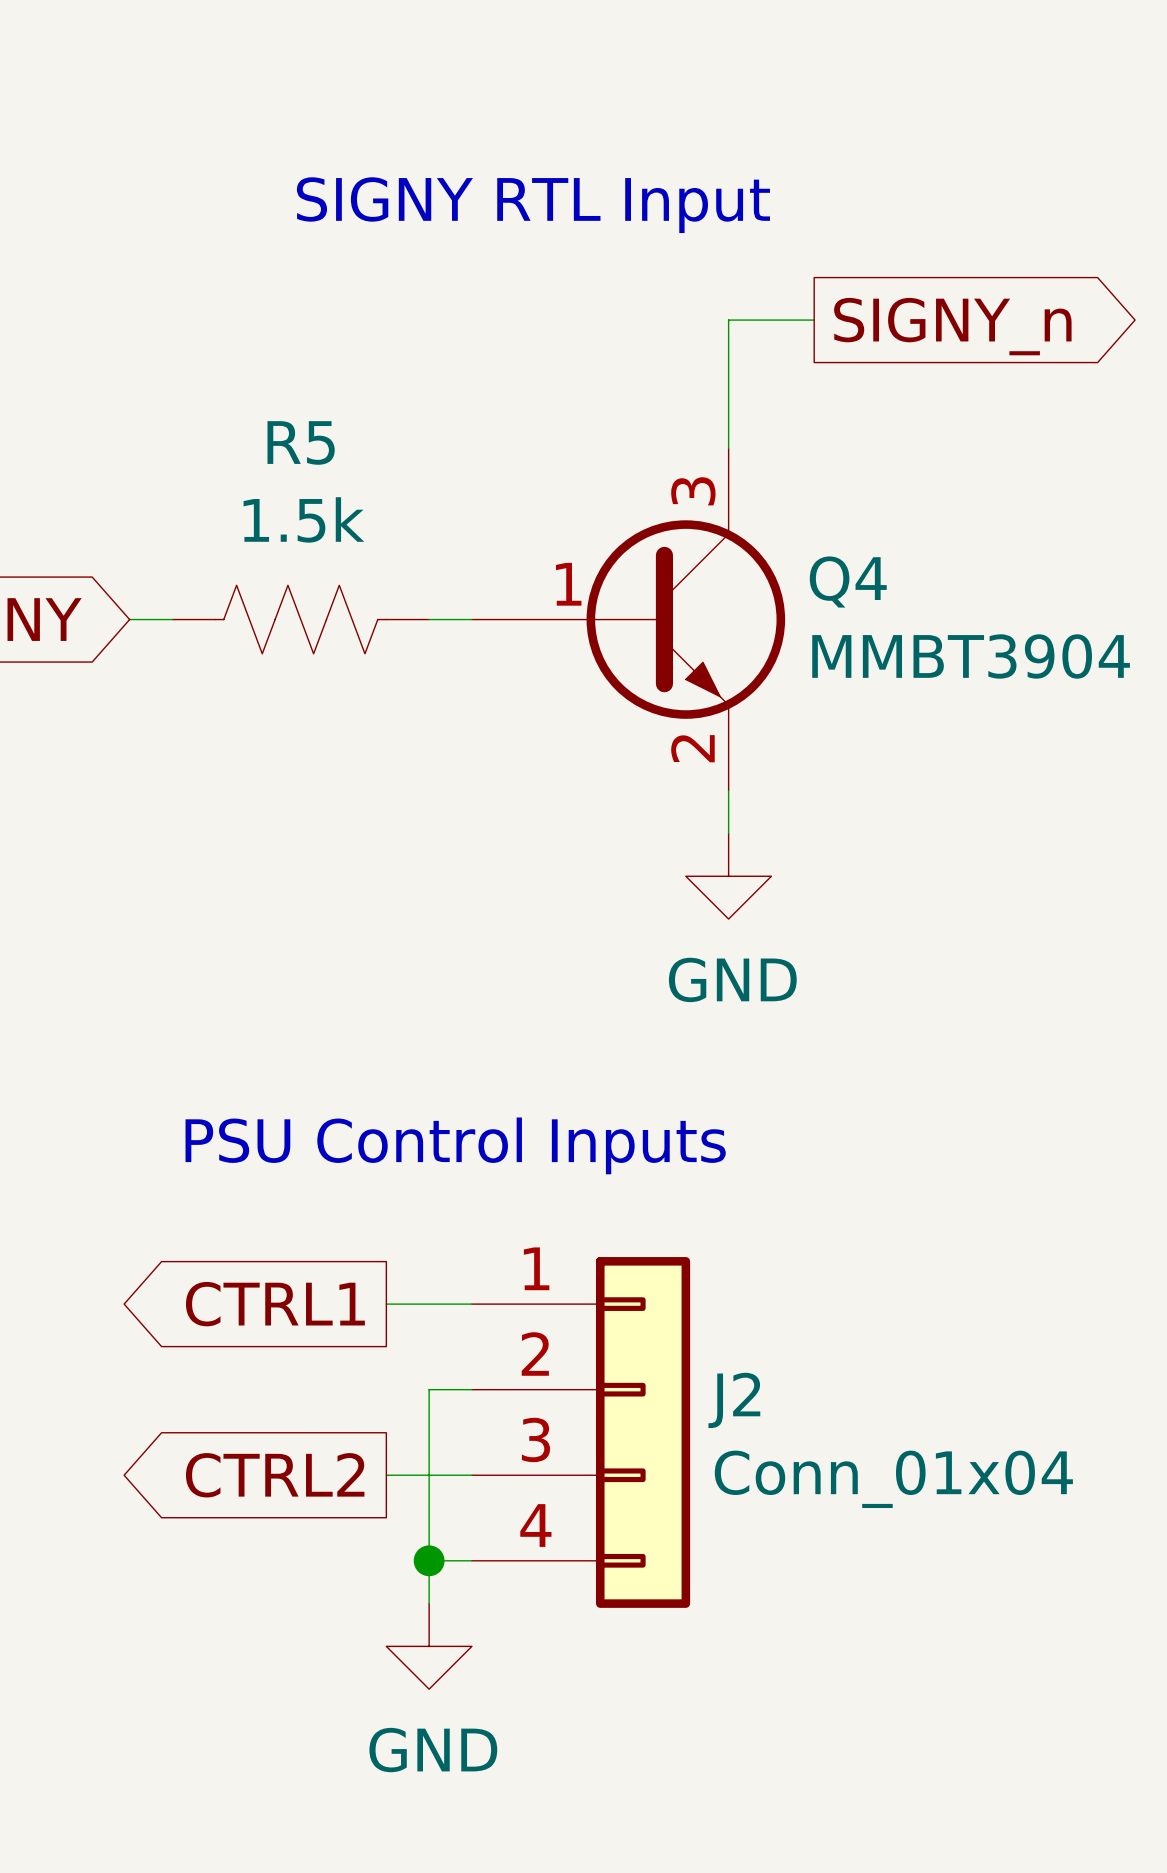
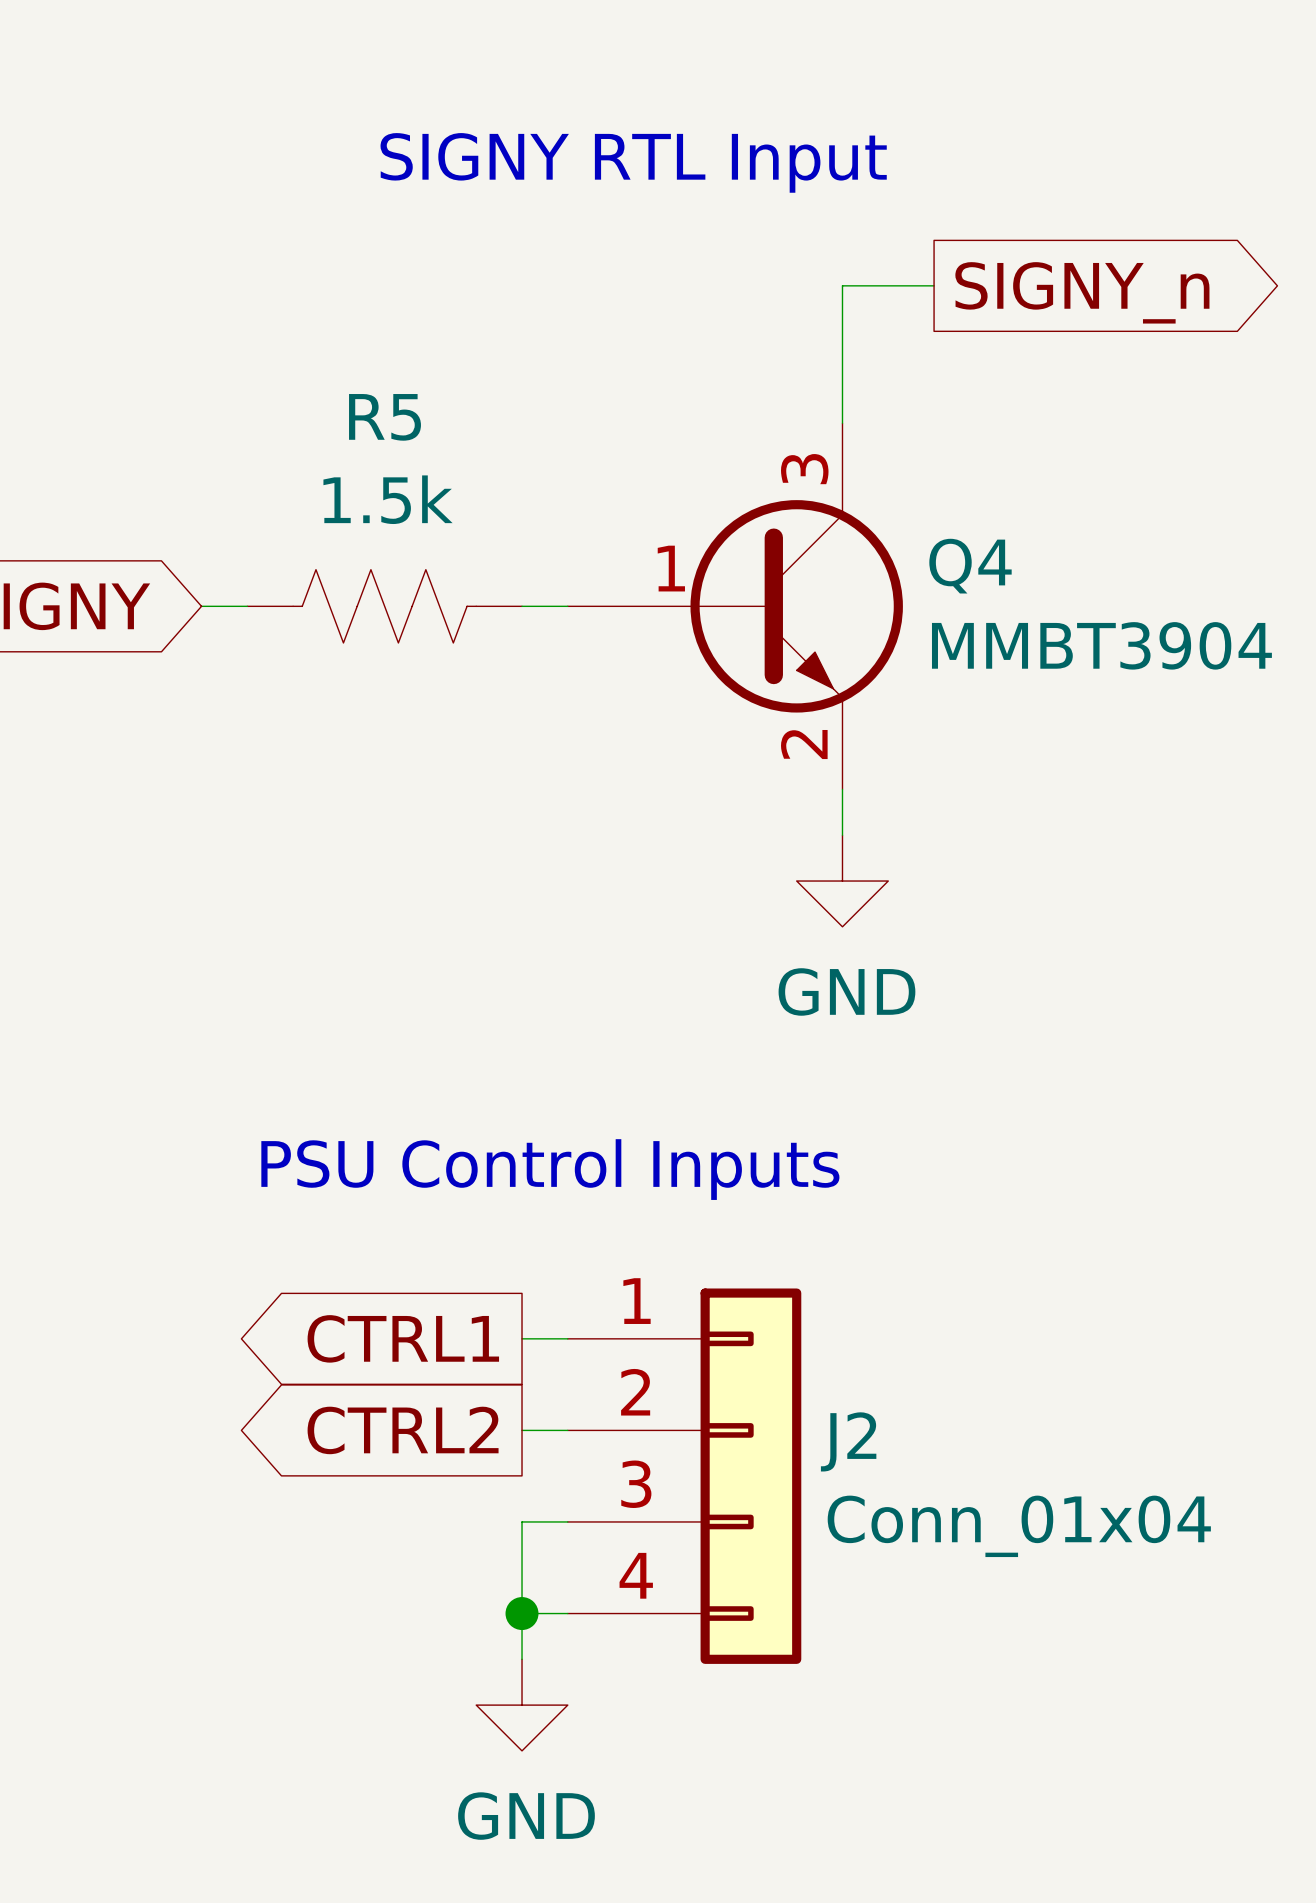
global label position: CTRL1 (275, 1304) -> CTRL1 (403, 1338)
wire: (386, 1304) (429, 1304) -> none
wire: (429, 1389) (429, 1475) (386, 1475) -> none
global label position: CTRL2 (275, 1475) -> CTRL2 (403, 1430)

